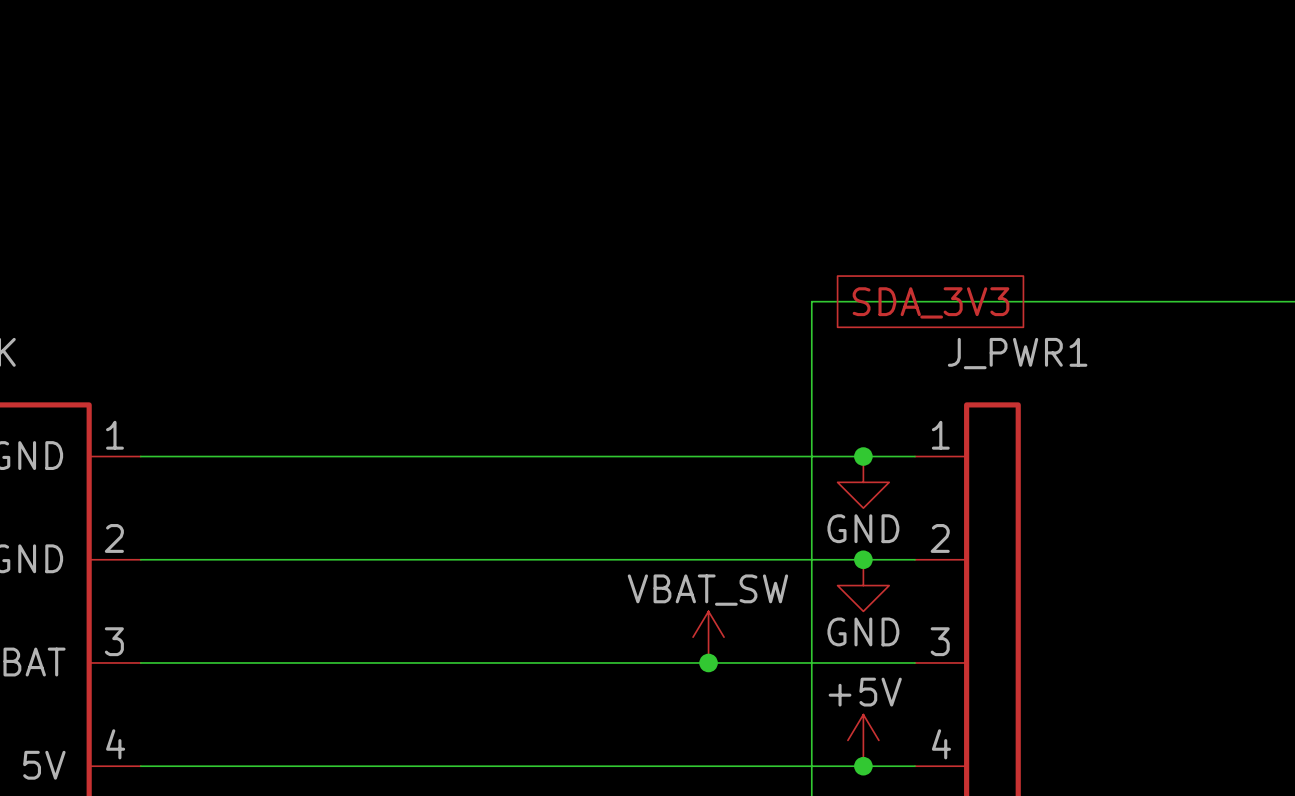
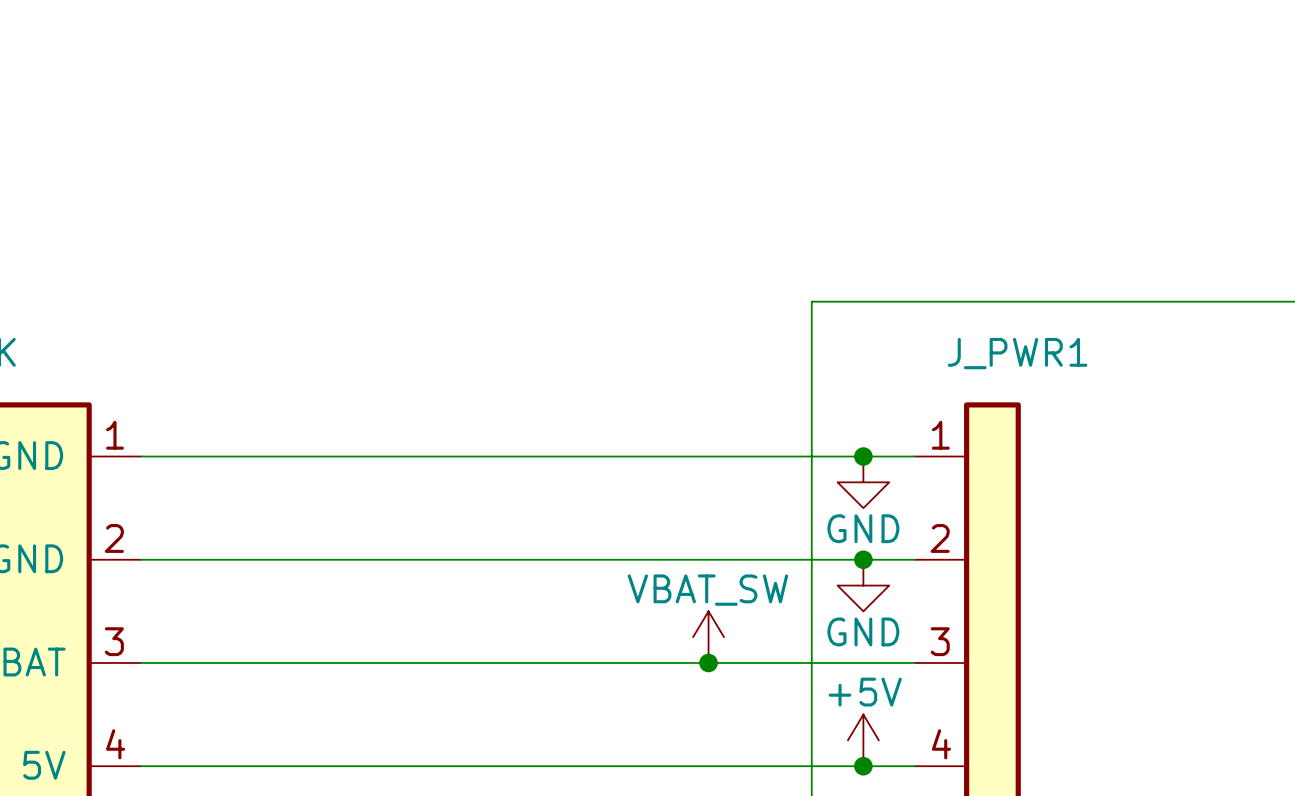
global label: SDA_3V3 (931, 302) -> none

